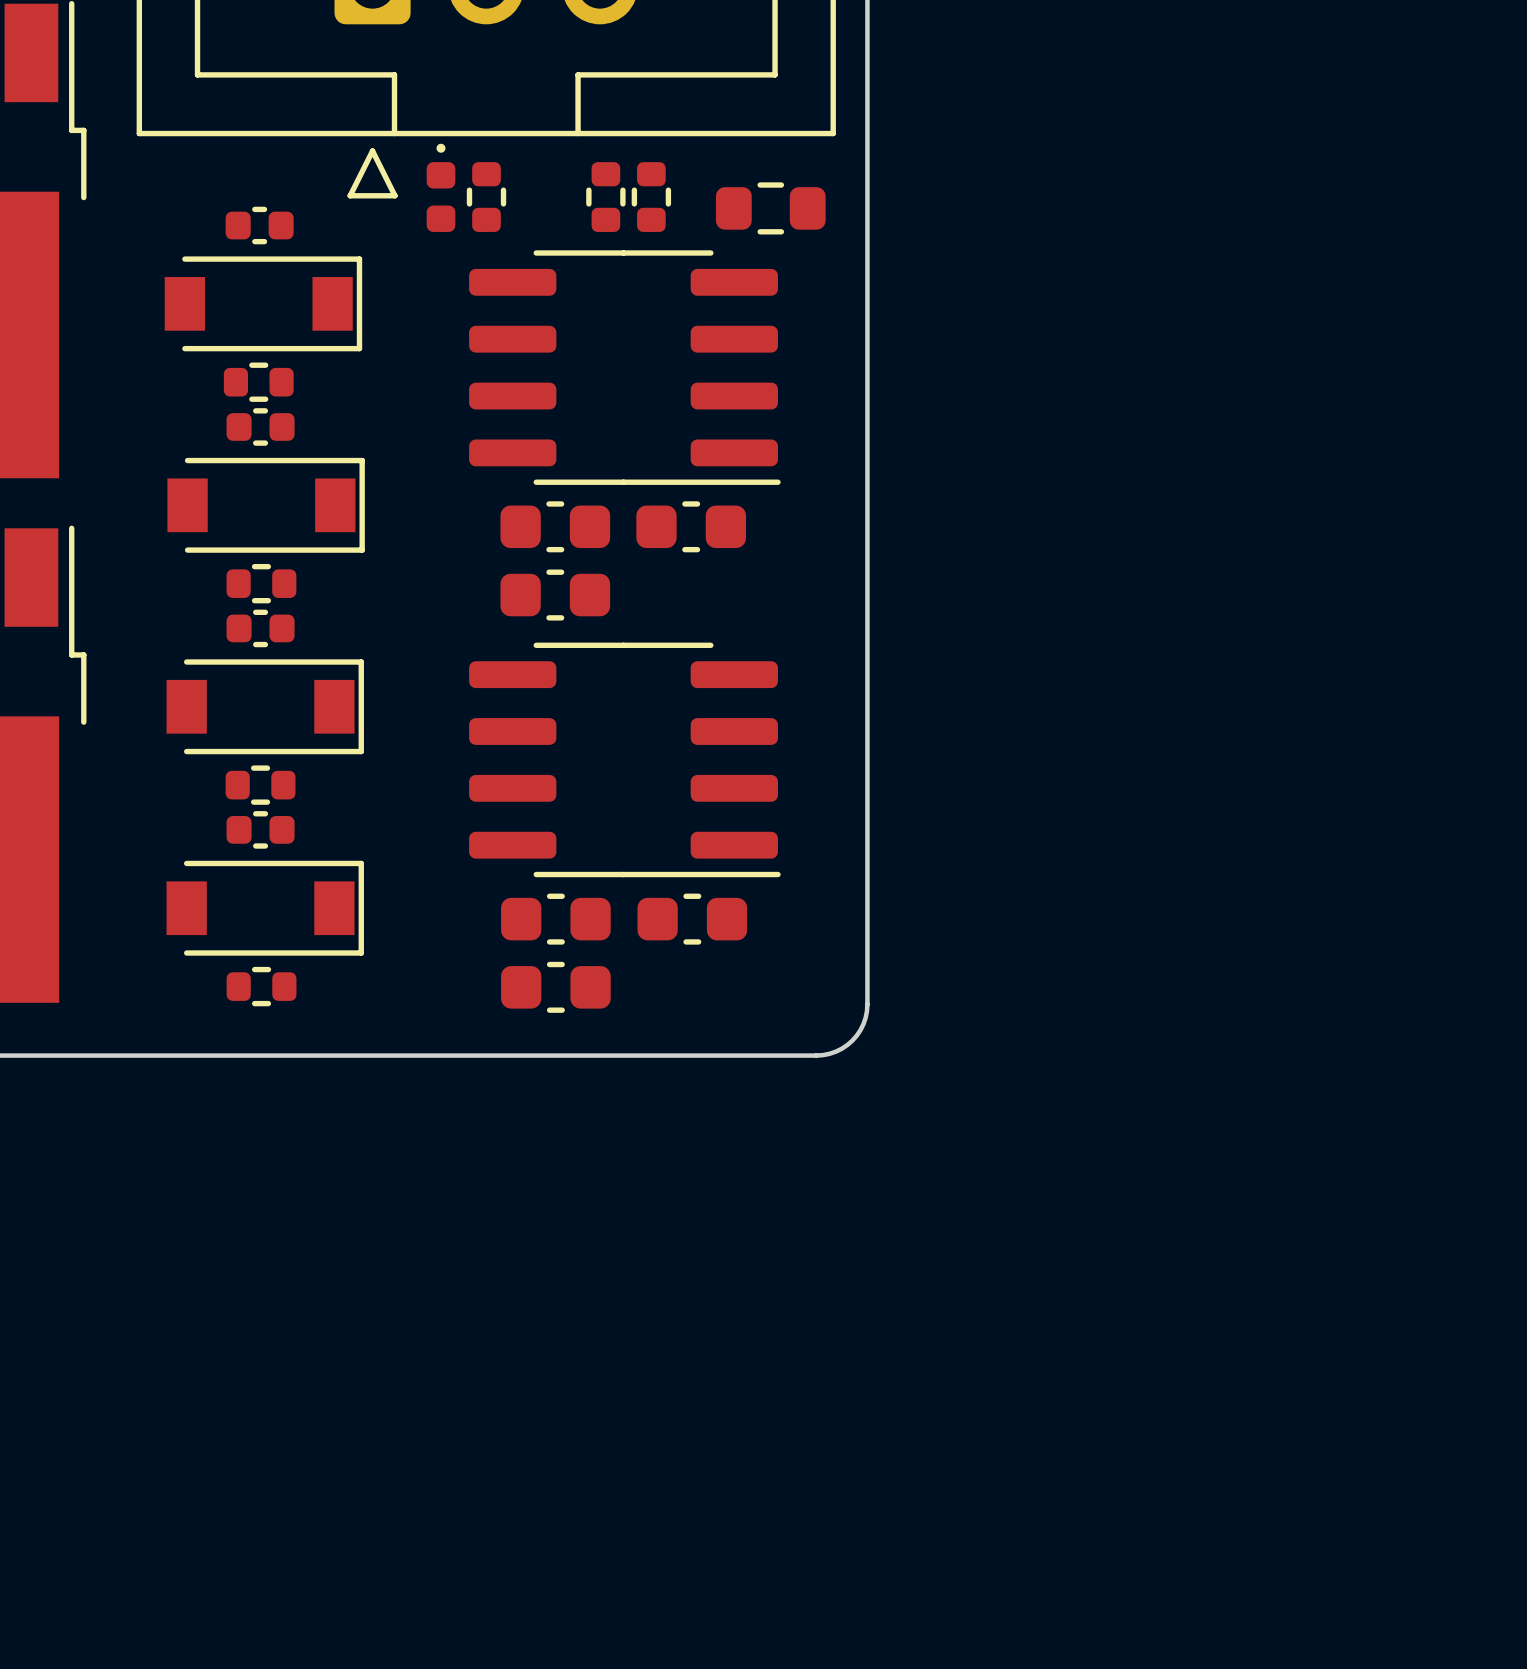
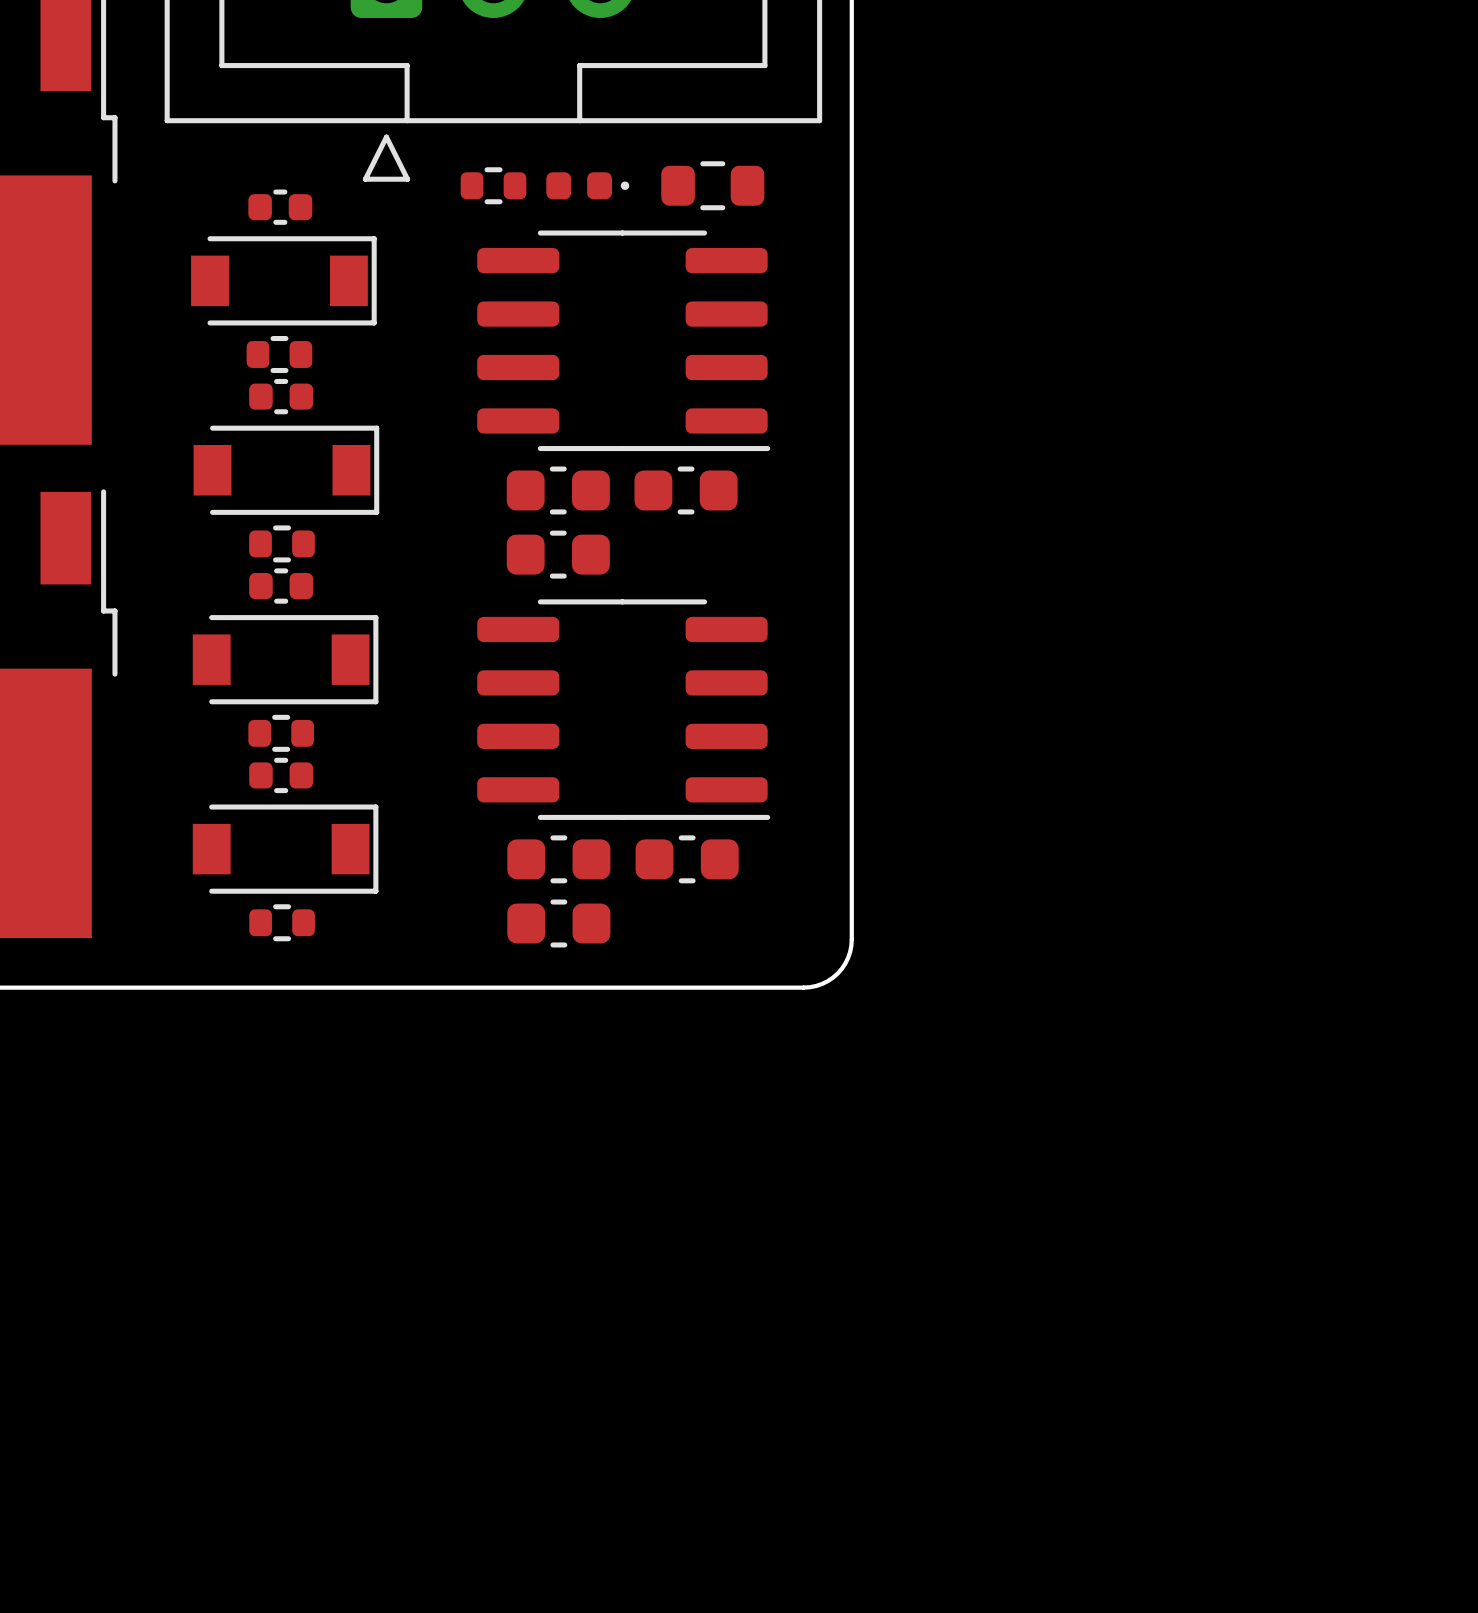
part footprint: [586, 162, 626, 232] -> [546, 172, 630, 200]
part: (441, 187) -> none
part rotation: 0° (486, 197) -> 90° clockwise (493, 185)
part: (651, 197) -> none
part position: (770, 208) -> (712, 185)

